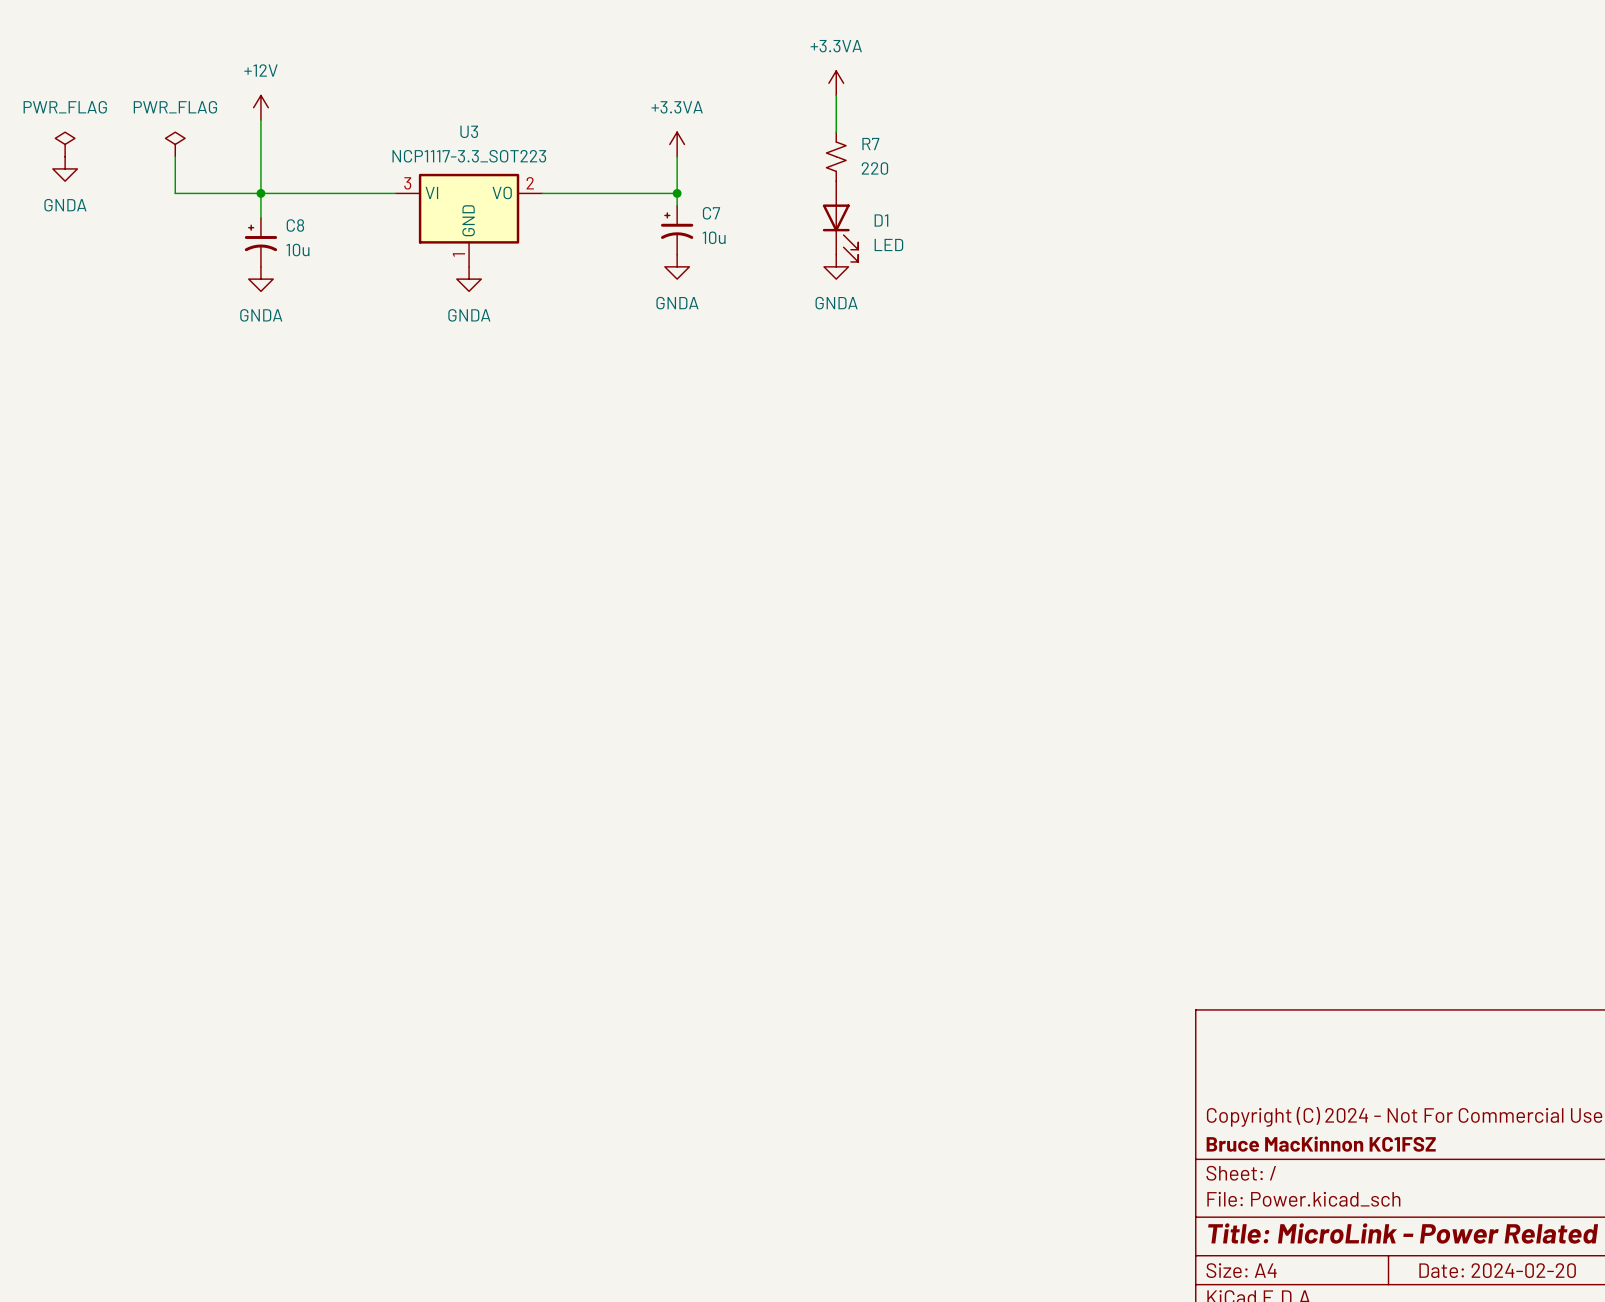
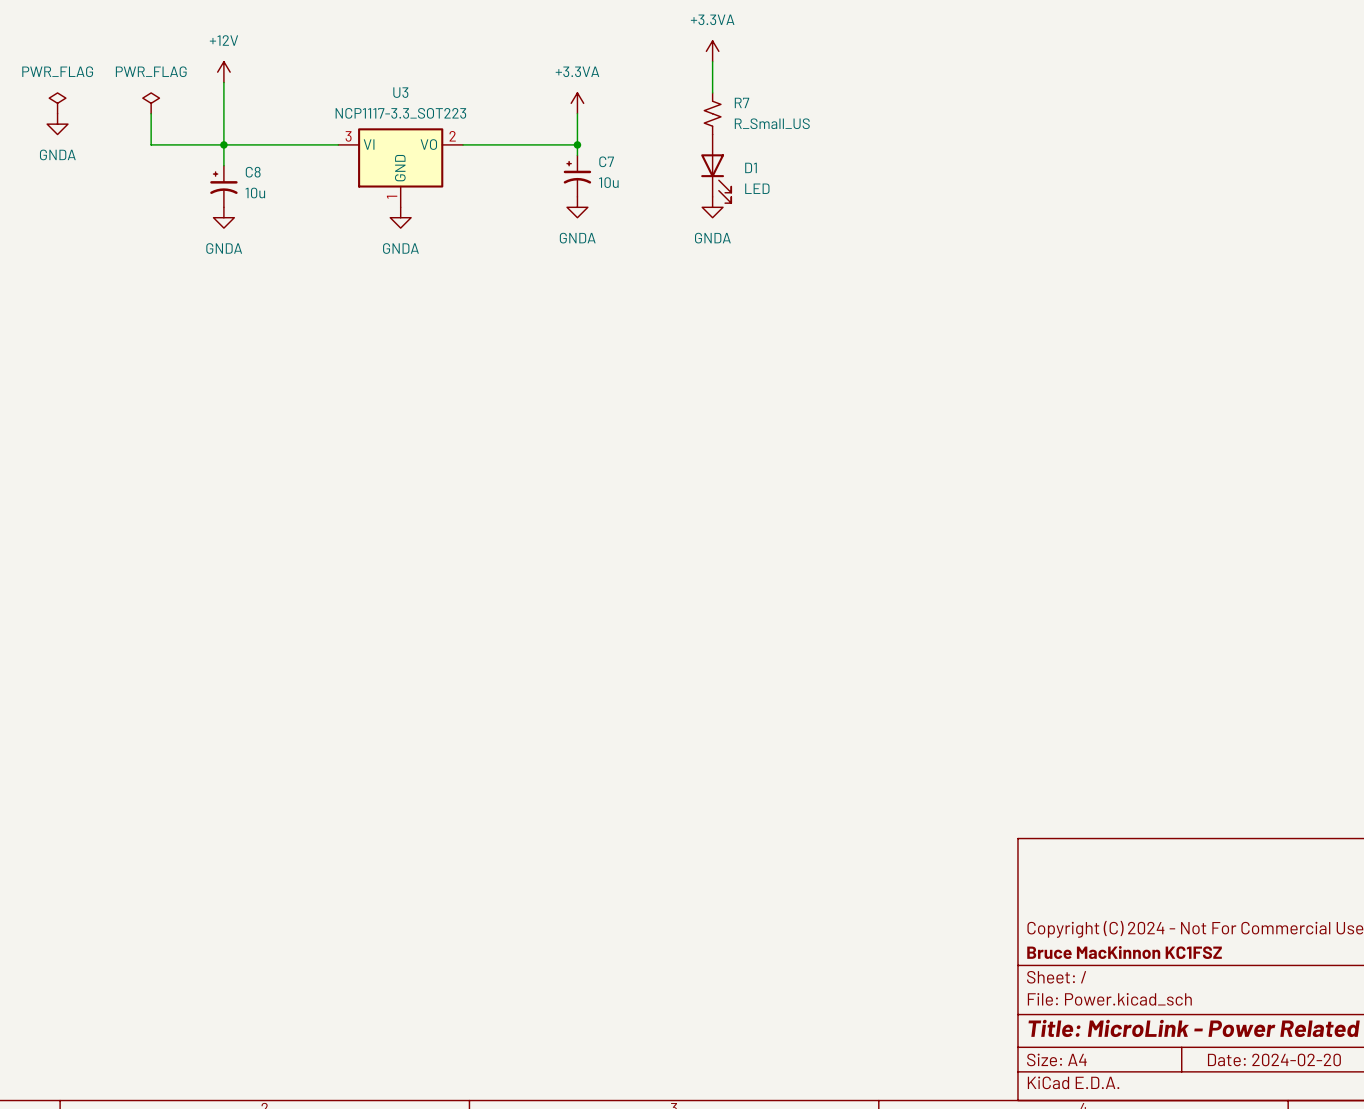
R7 value: 220 (874, 168) -> R_Small_US (772, 123)

